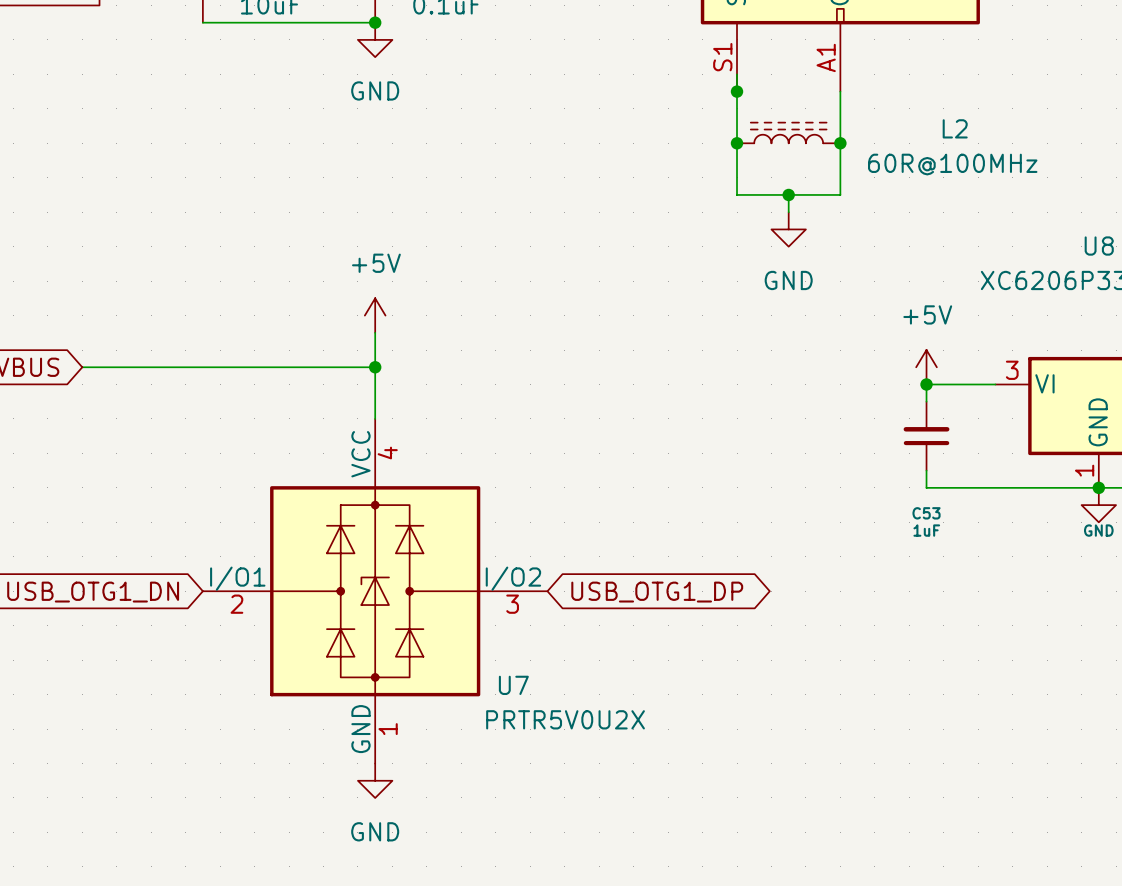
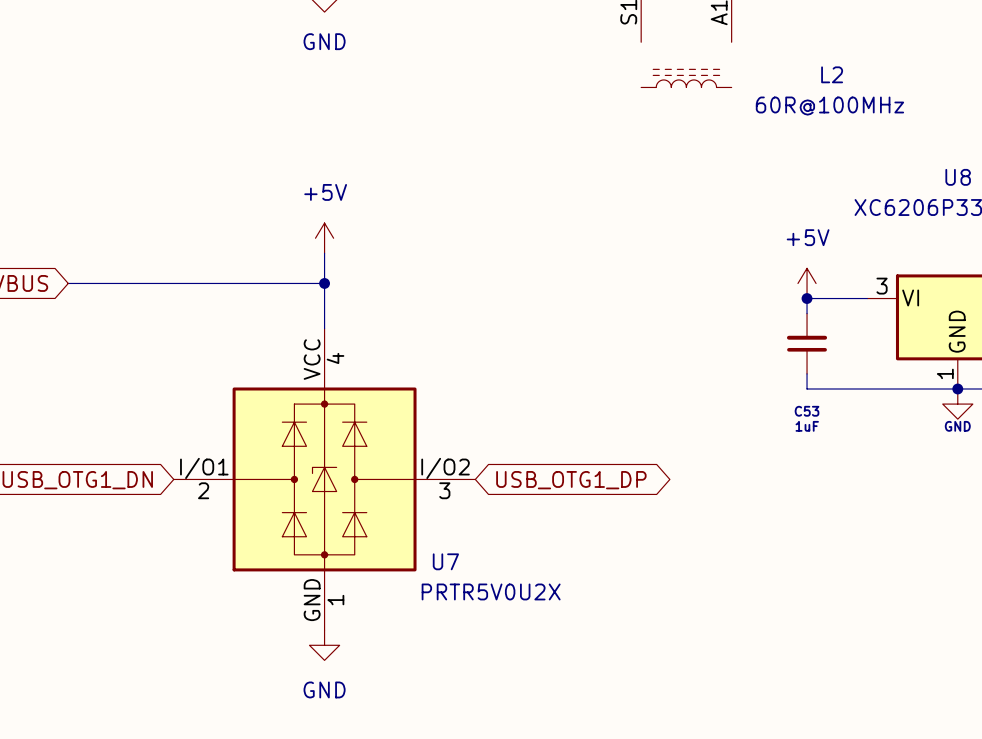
wire: (737, 74) (737, 194) (840, 194) (840, 91) -> none
junction: (737, 91) -> none
junction: (737, 143) -> none
junction: (840, 143) -> none
wire: (788, 194) (788, 212) -> none
junction: (788, 194) -> none
power symbol: GND (788, 229) -> none

